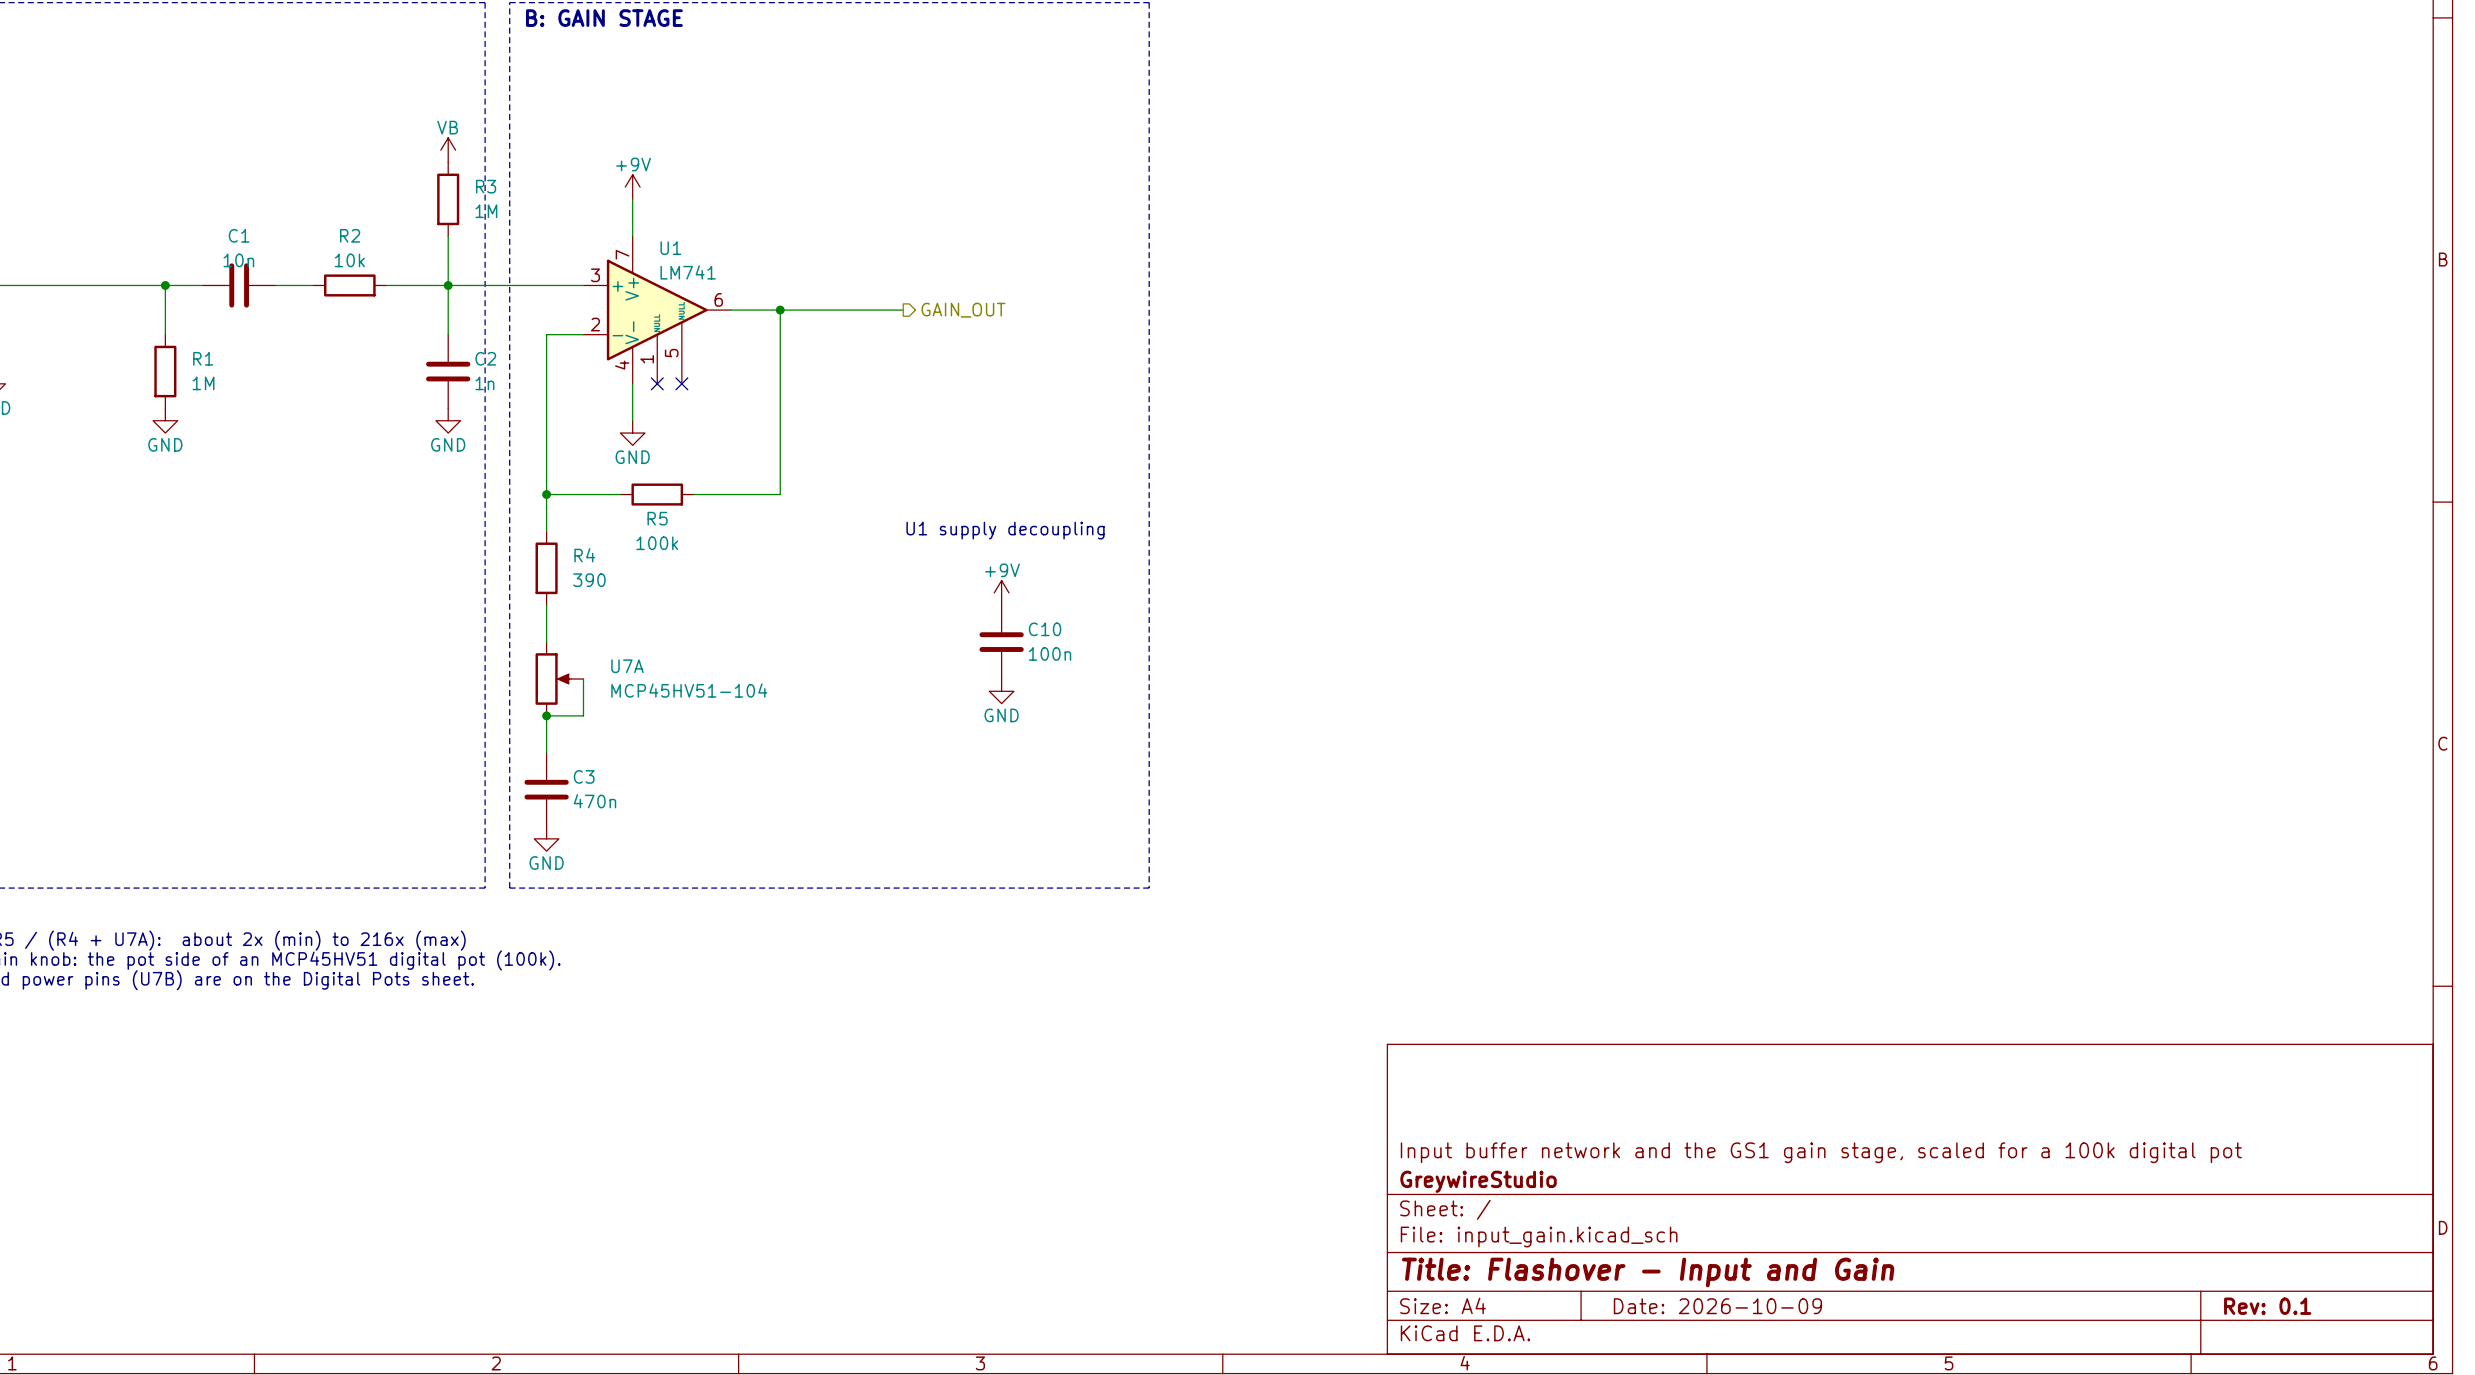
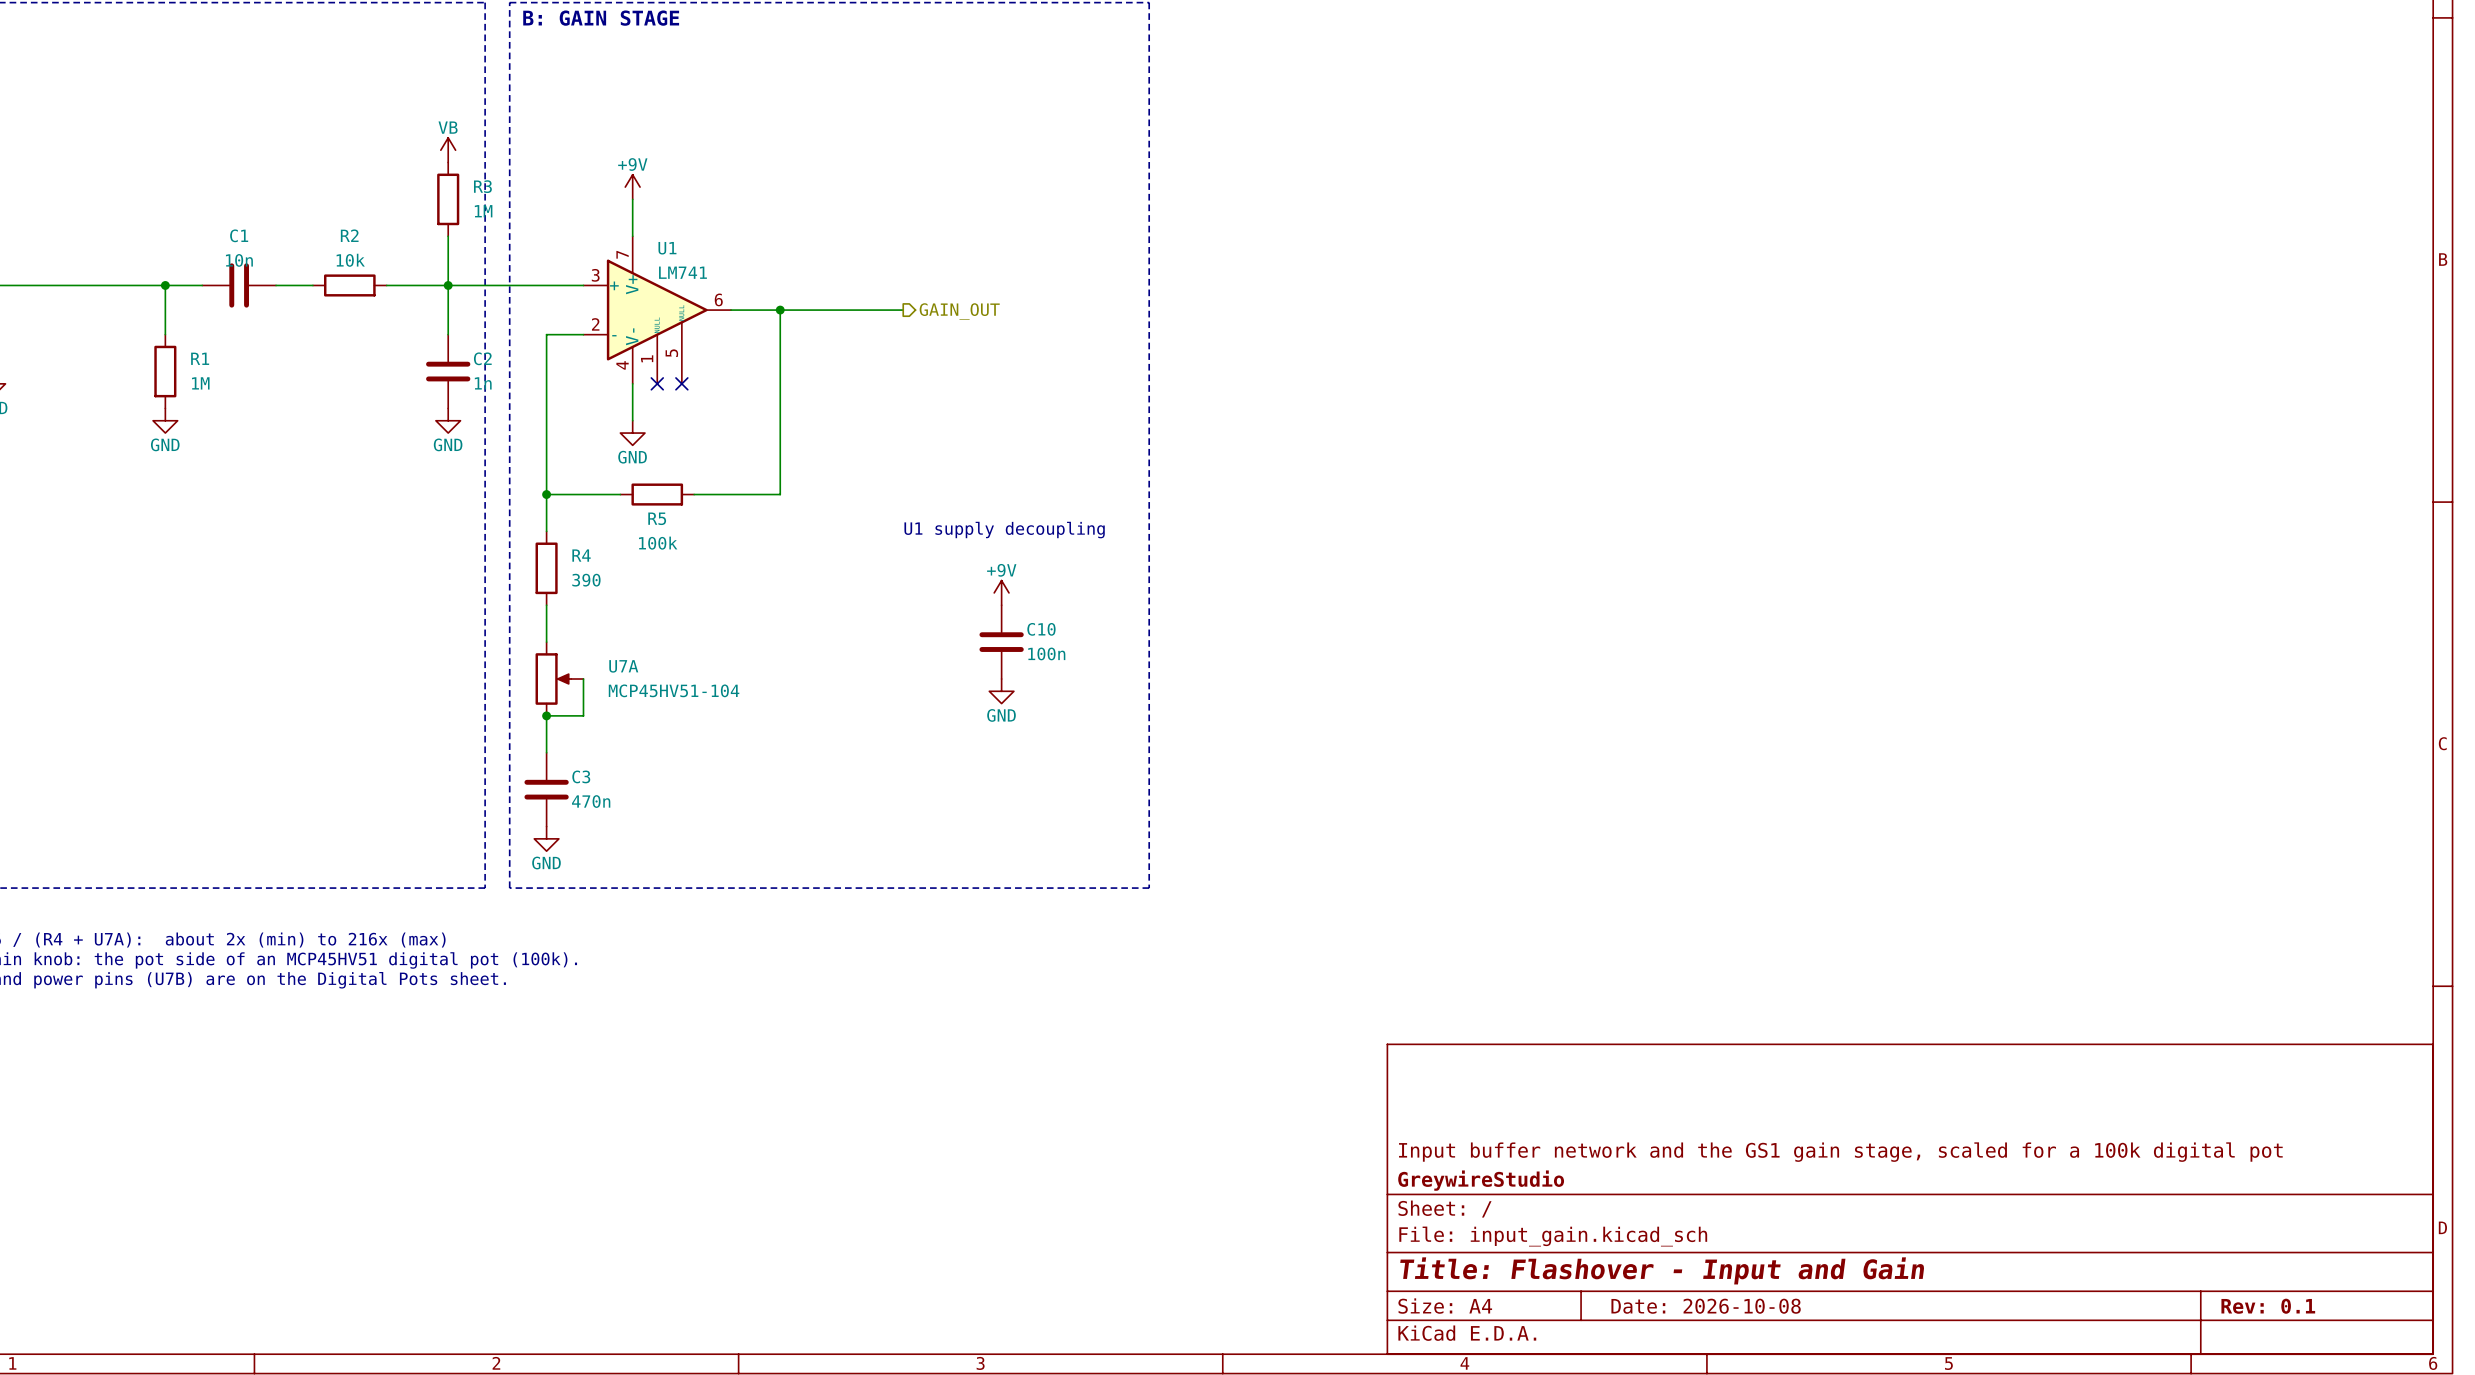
title block: Date: 2026-10-09 (1717, 1306) -> Date: 2026-10-08 (1706, 1306)

